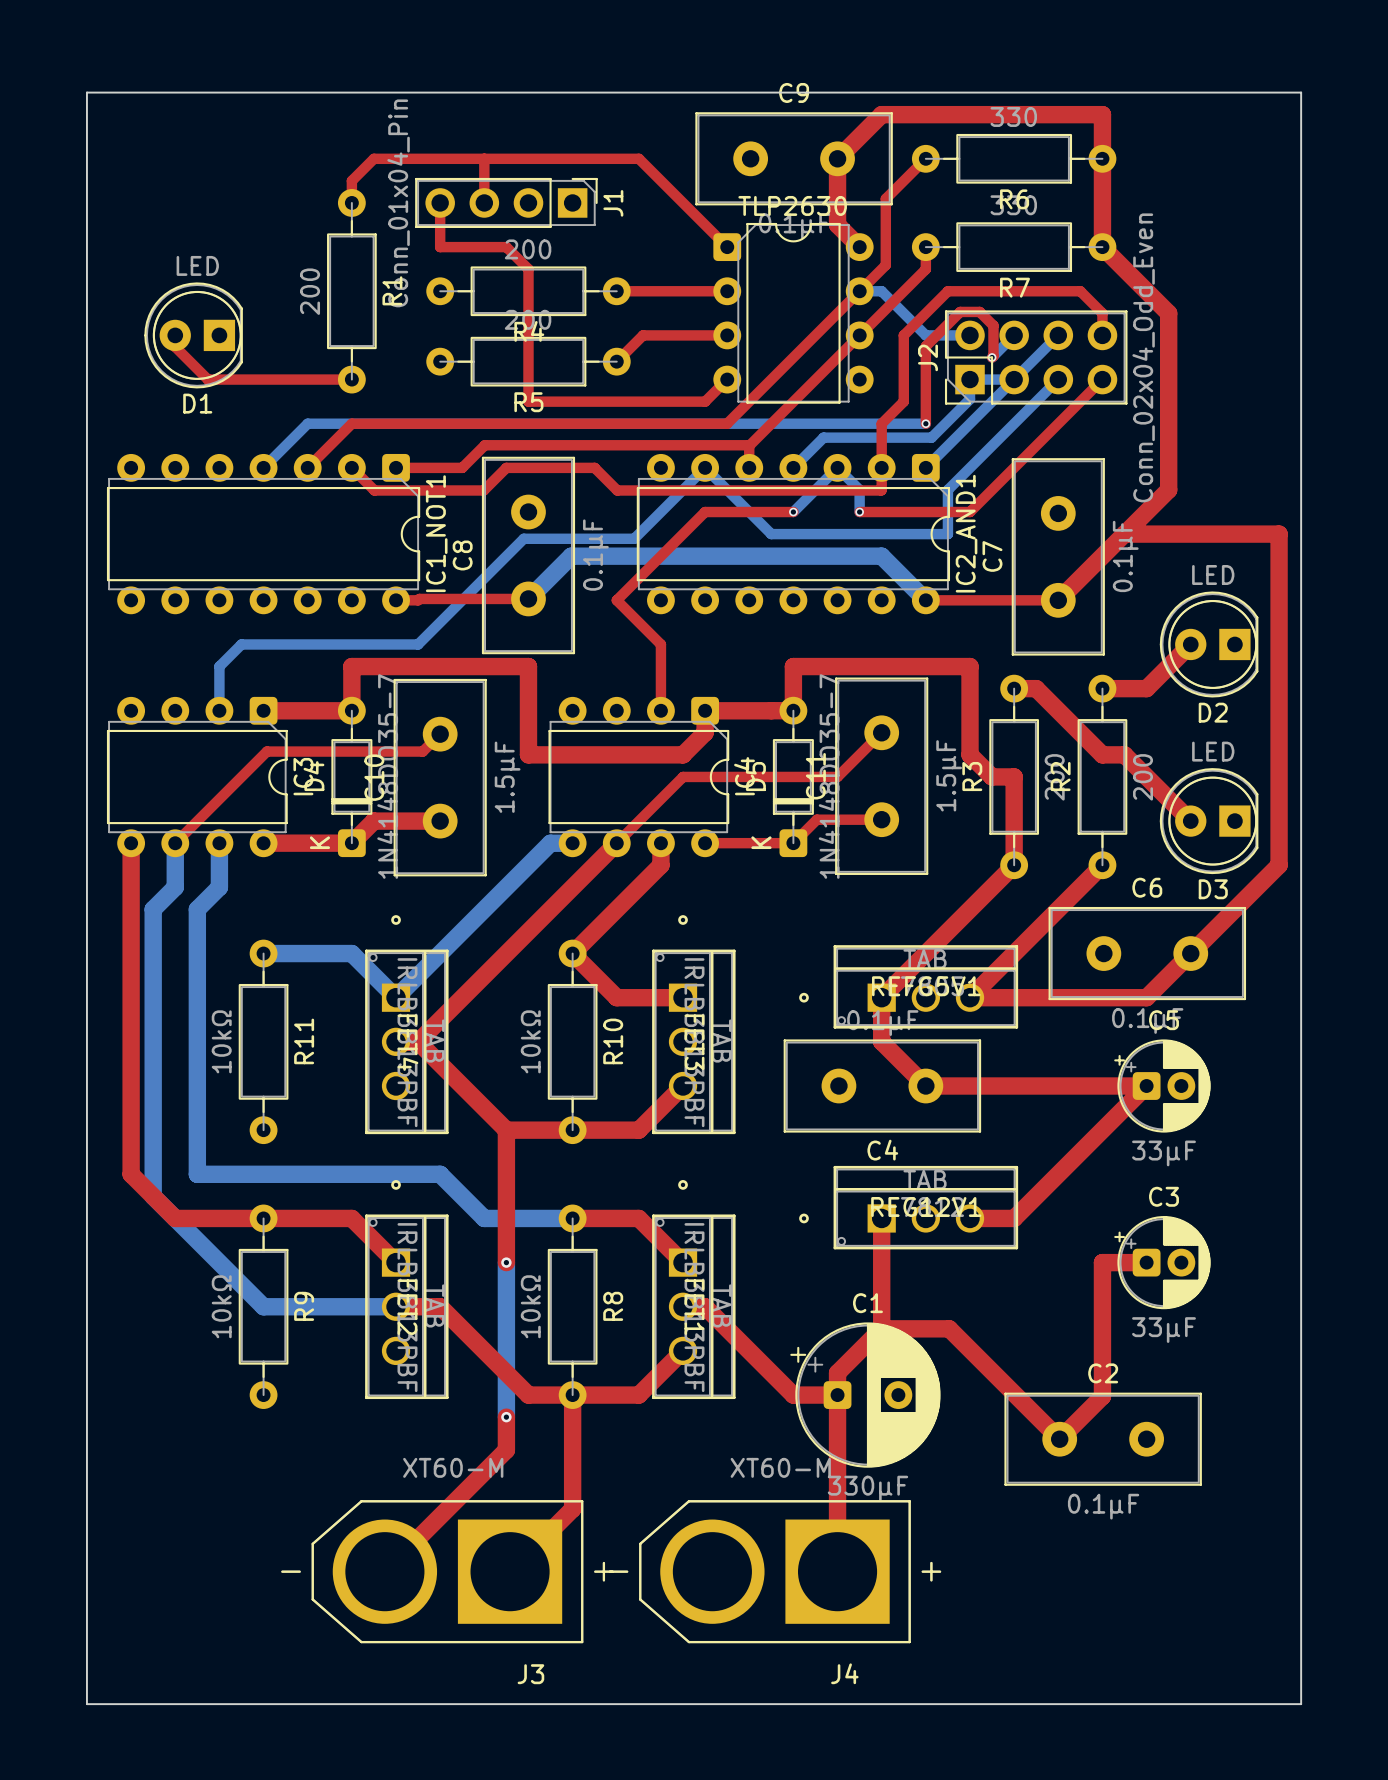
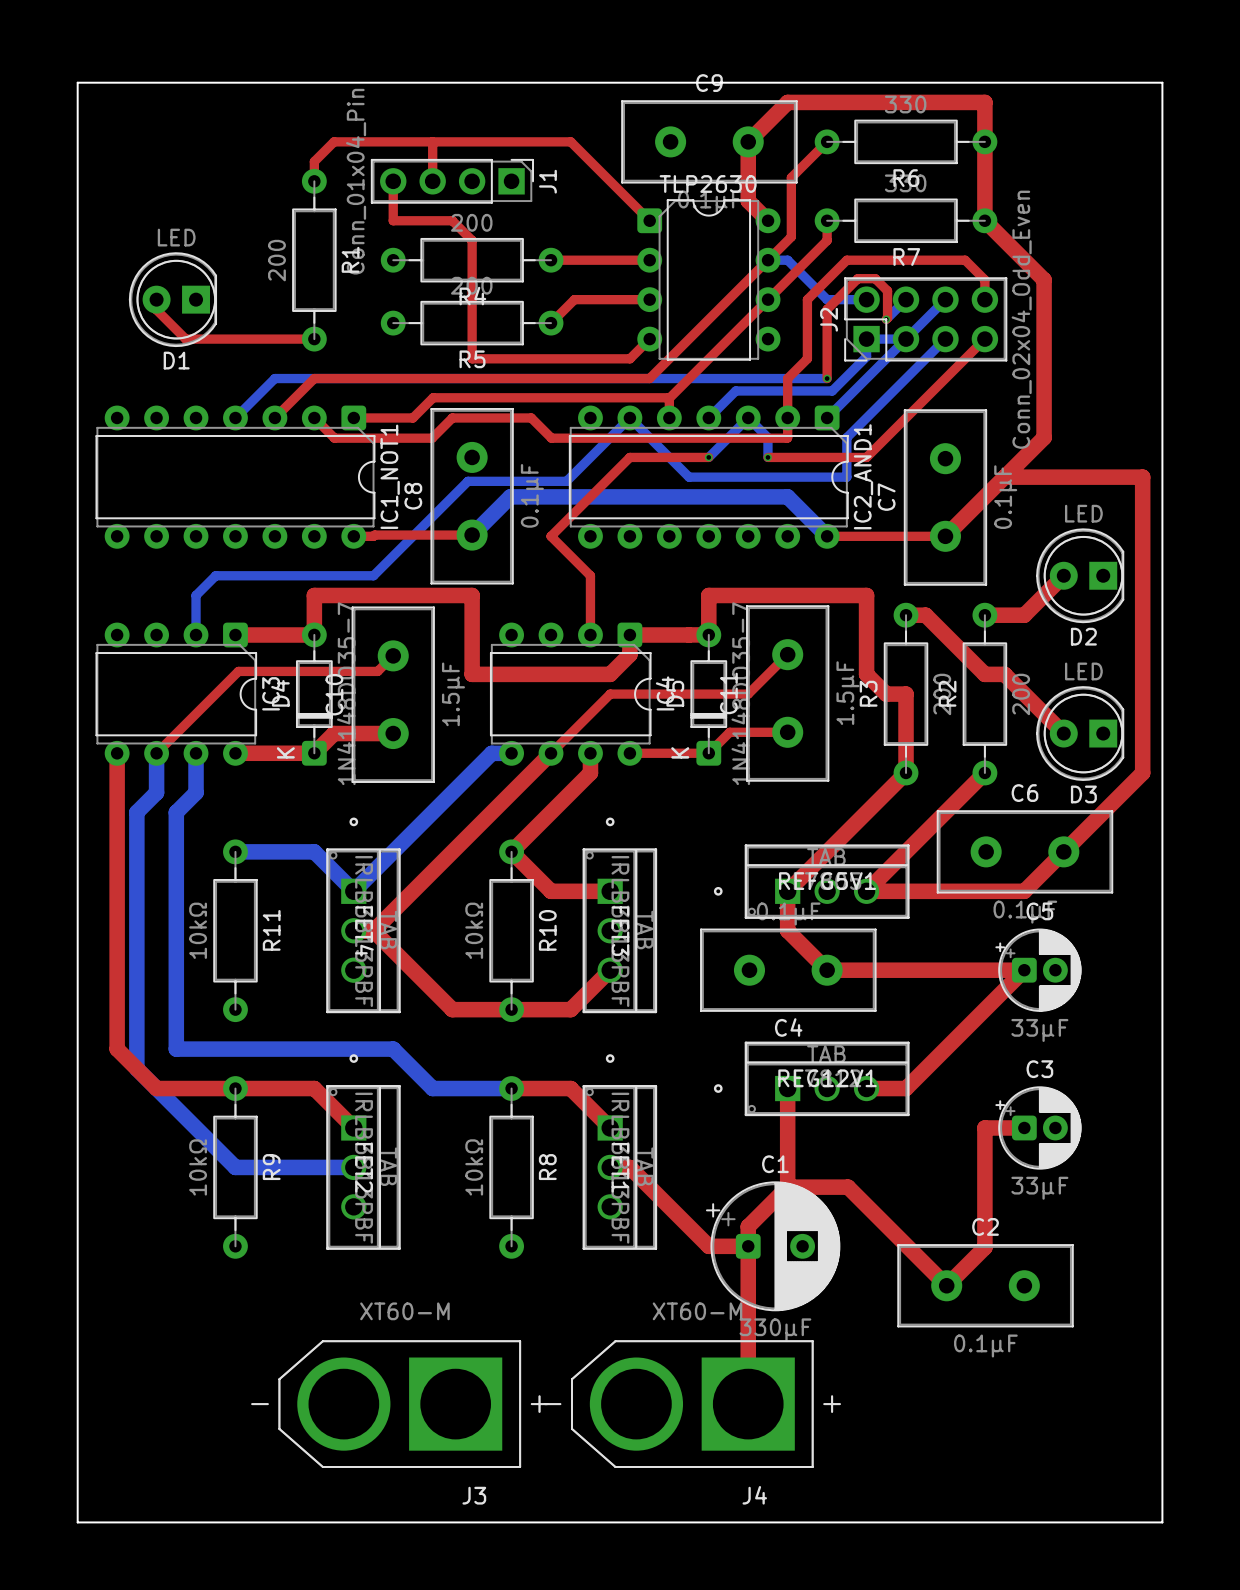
top track: (506, 1130) (506, 1262) -> none
bottom track: (506, 1262) (506, 1417) -> none
via: (506, 1262) -> none
top track: (396, 1306) (440, 1306) (528, 1395) (638, 1395) (683, 1350) -> none
top track: (572, 1395) (572, 1509) (510, 1571) -> none
top track: (506, 1417) (506, 1450) (384, 1571) -> none
via: (506, 1417) -> none

